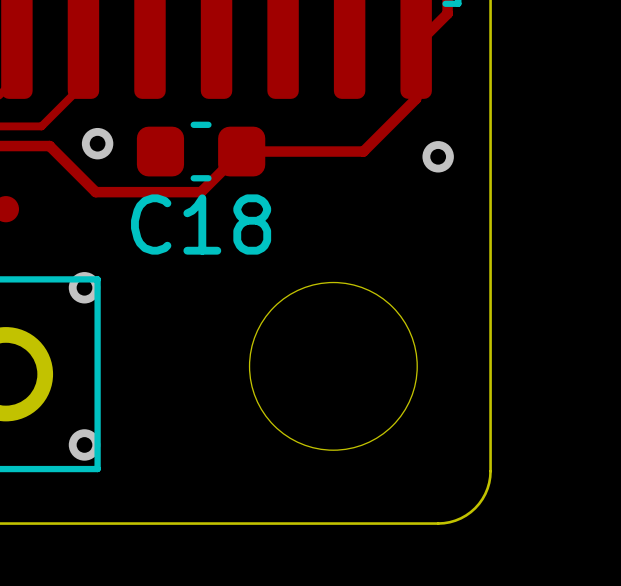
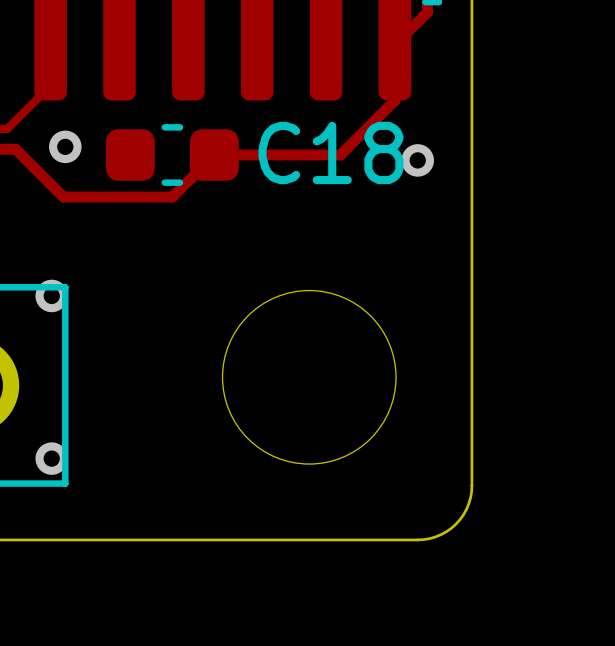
C18 name position: C18 (201, 224) -> C18 (330, 152)

